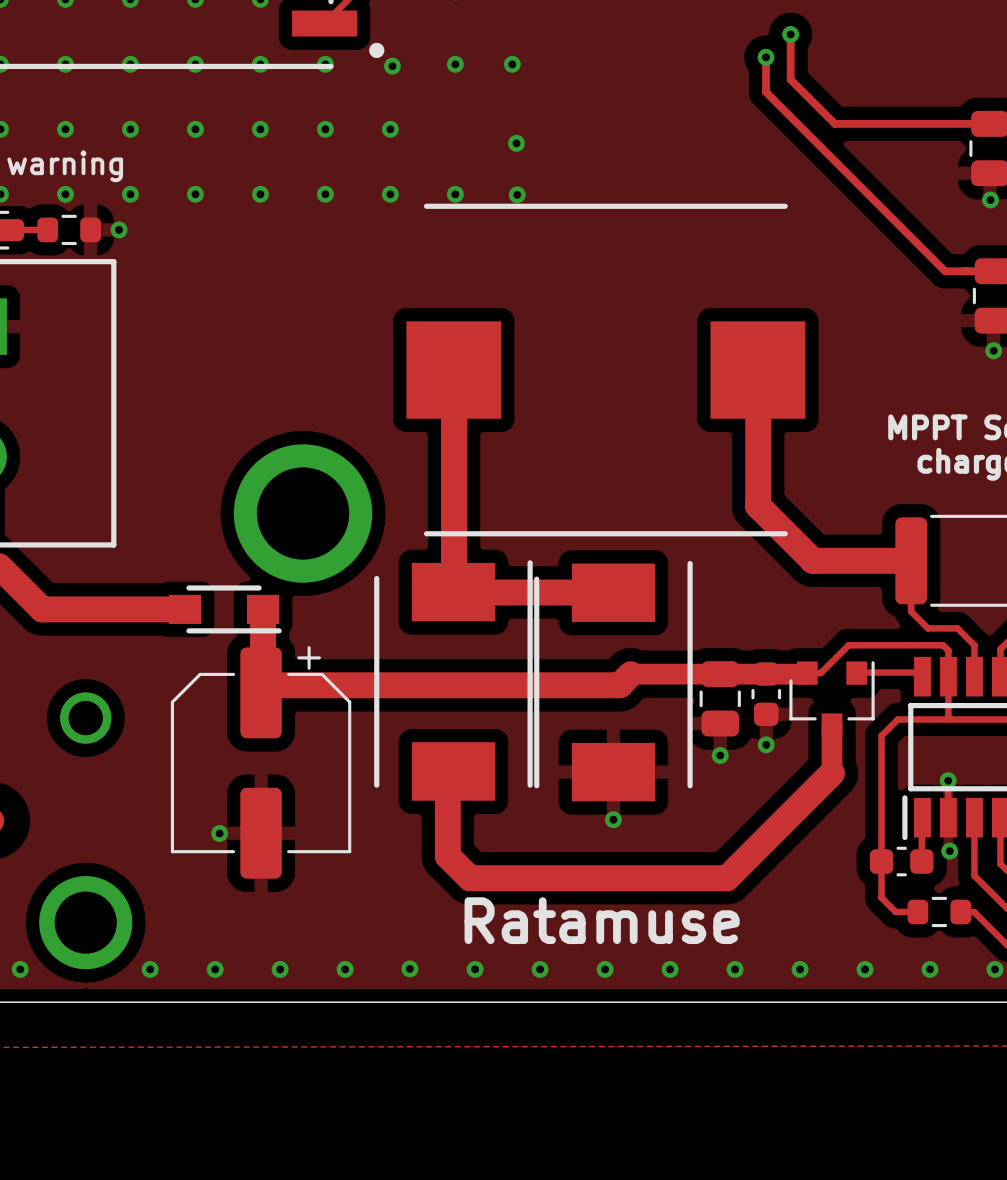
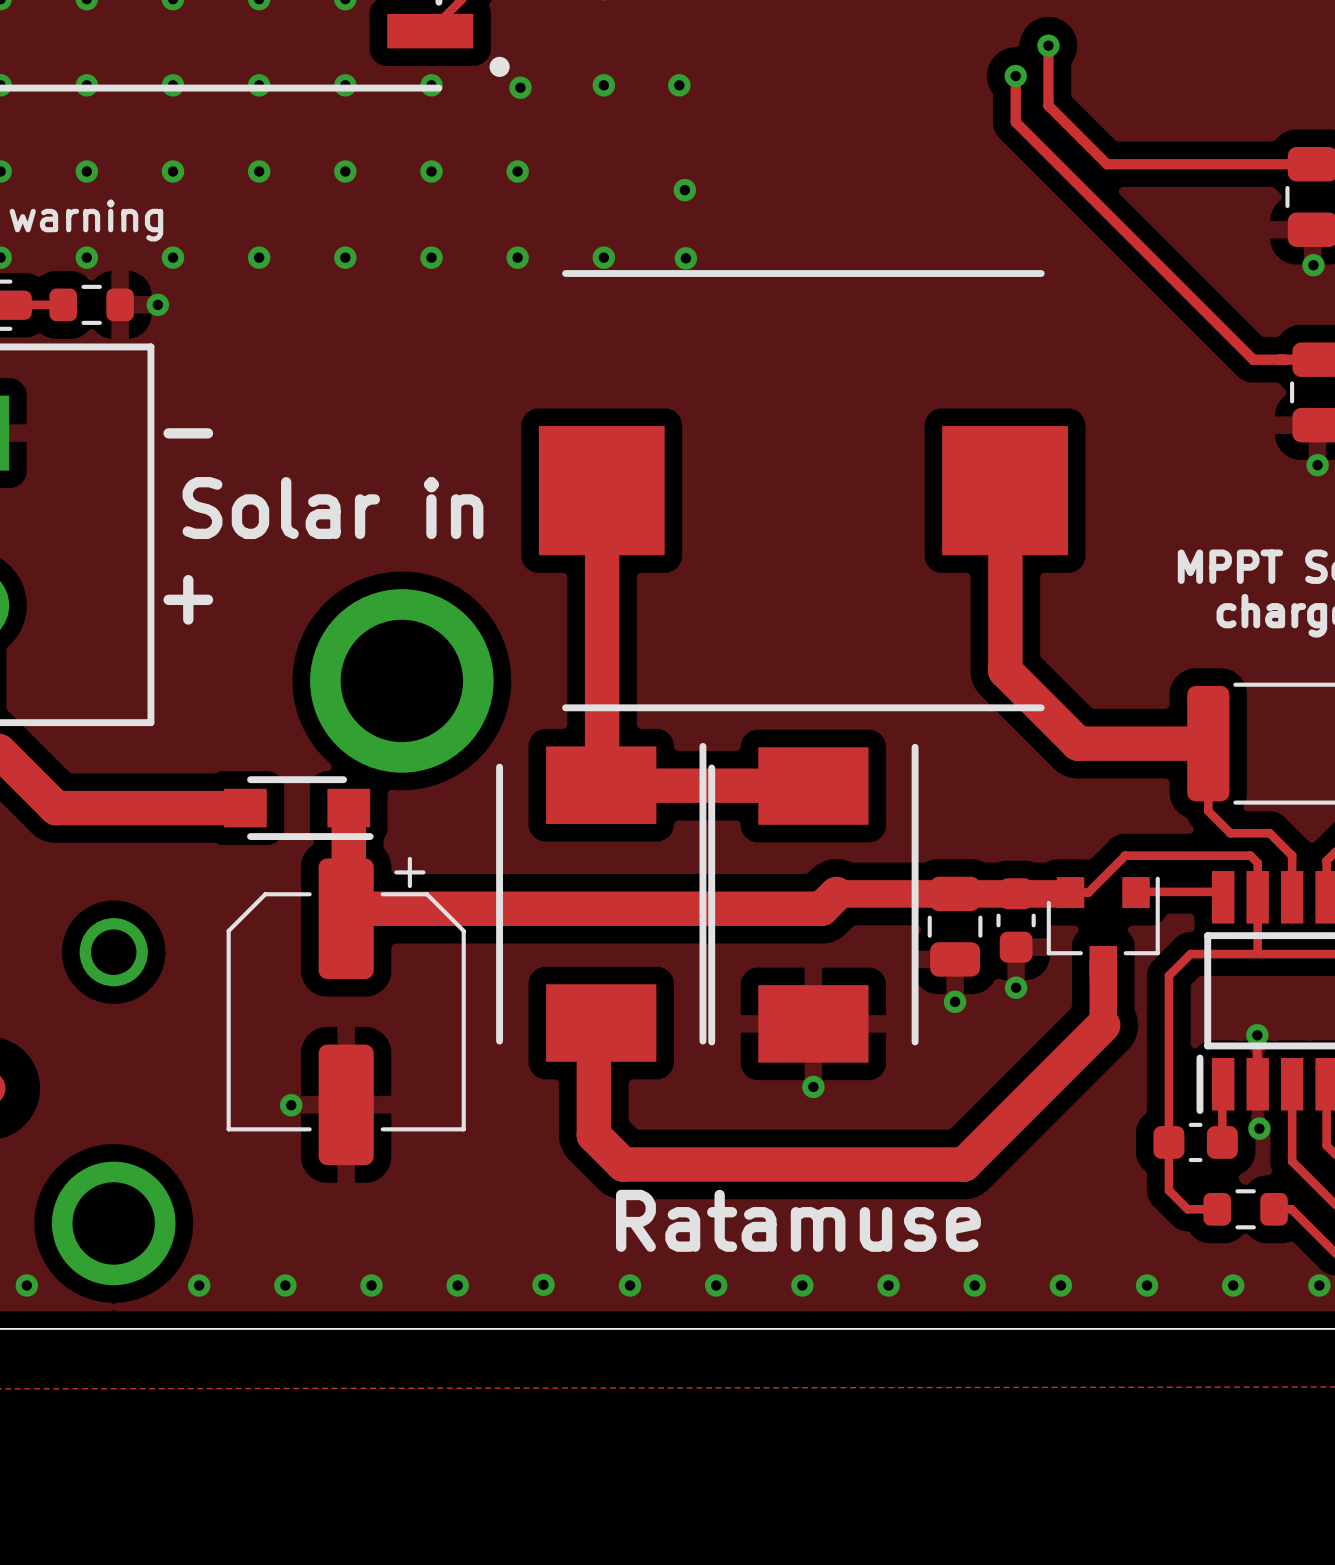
text: none -> - (188, 433)
text: none -> Solar in (332, 508)
text: none -> + (188, 599)

